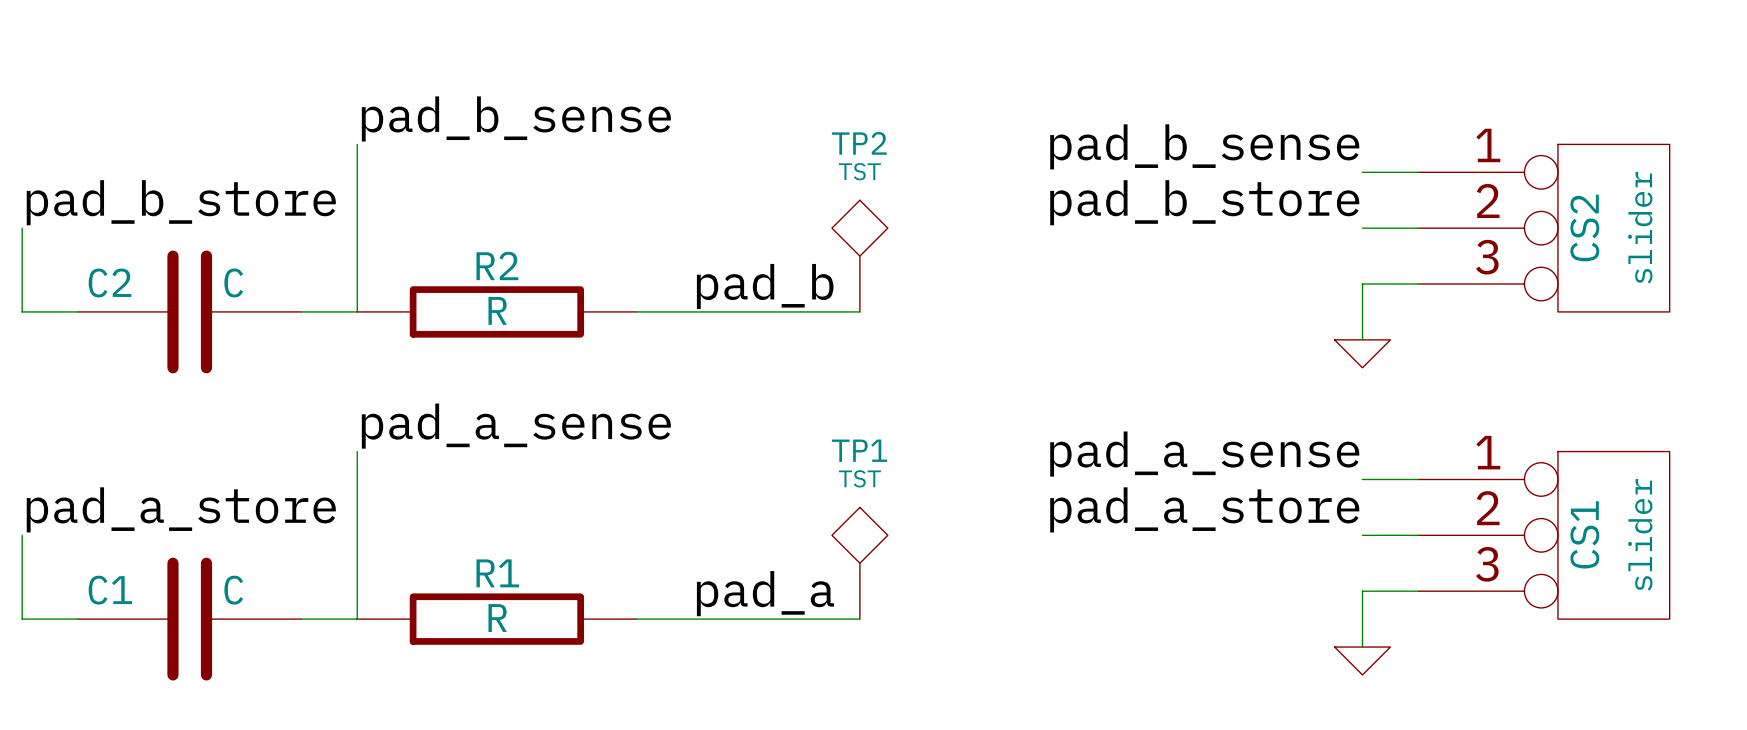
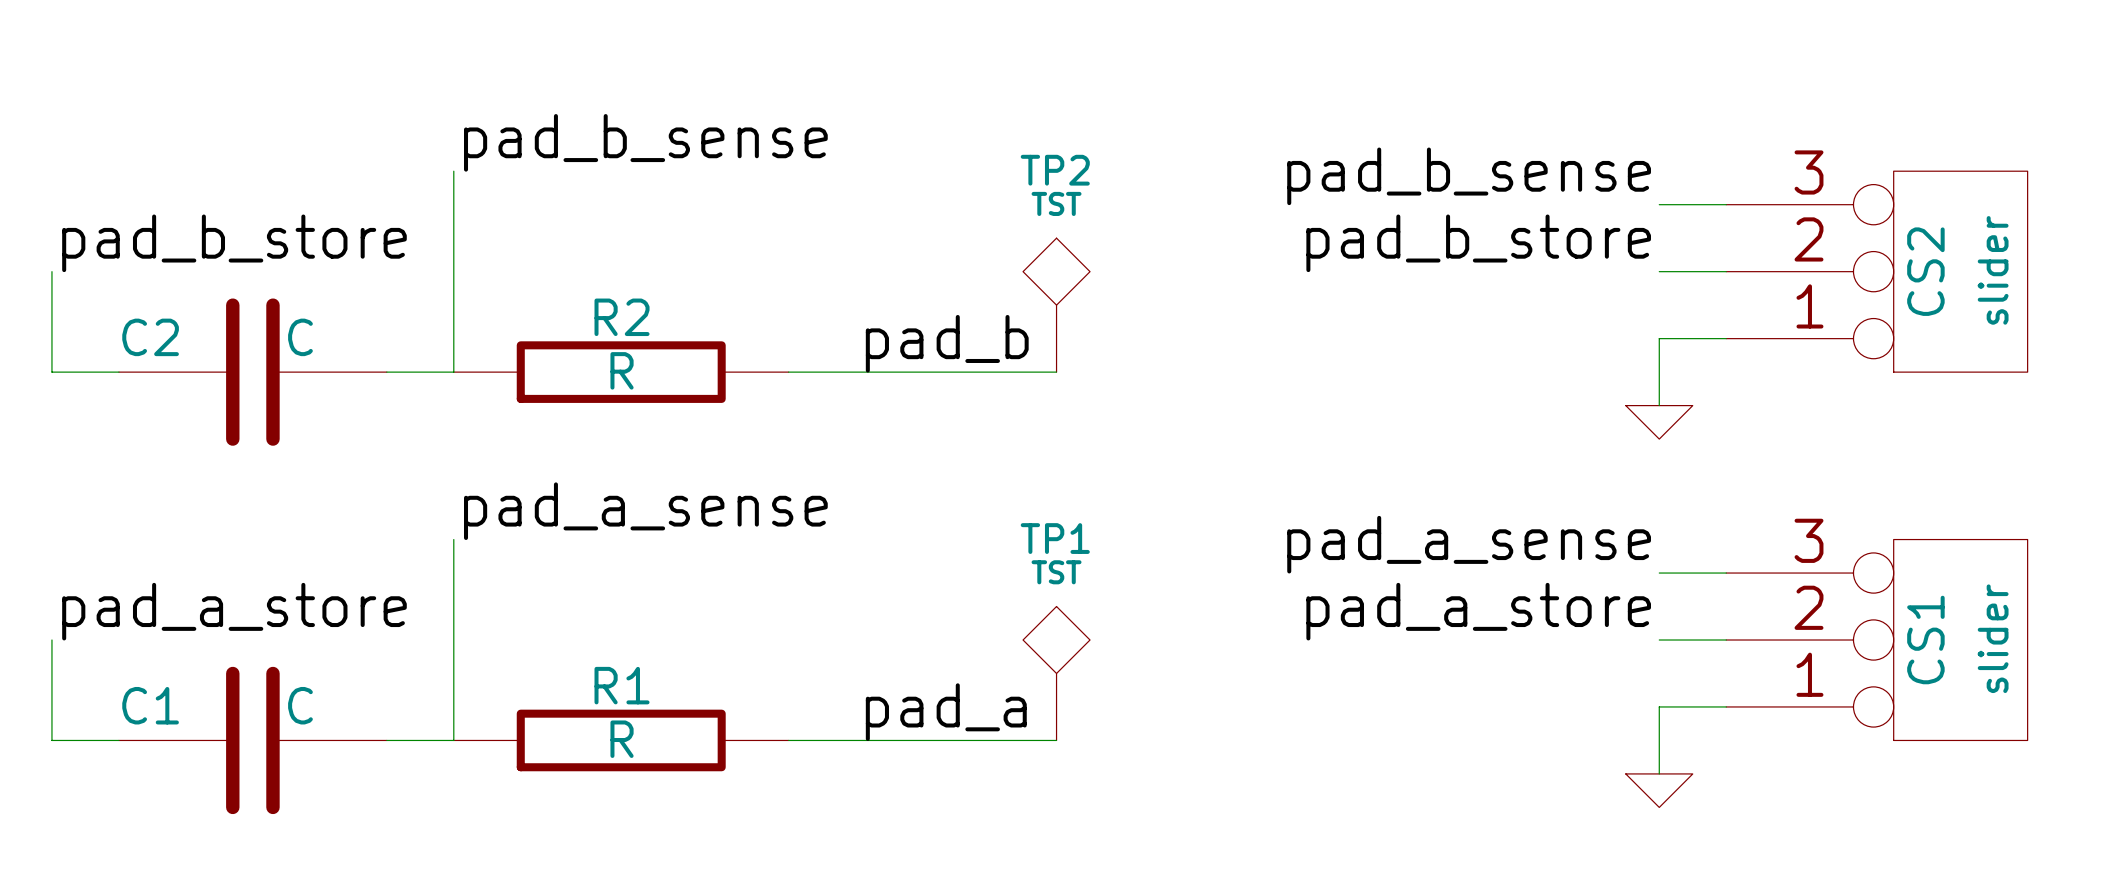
CS2 flip: as is (1613, 228) -> up-down (1960, 271)
CS1 flip: as is (1613, 535) -> up-down (1960, 640)

